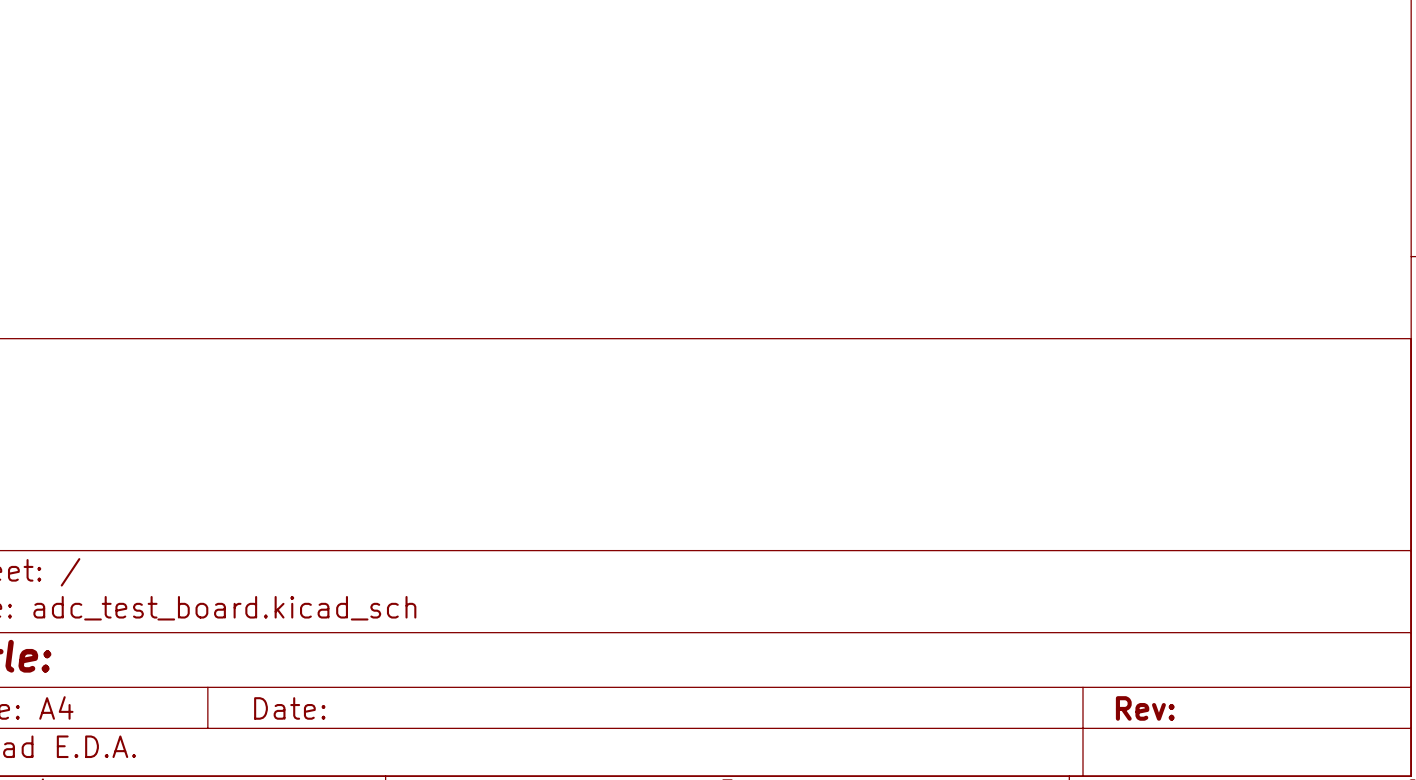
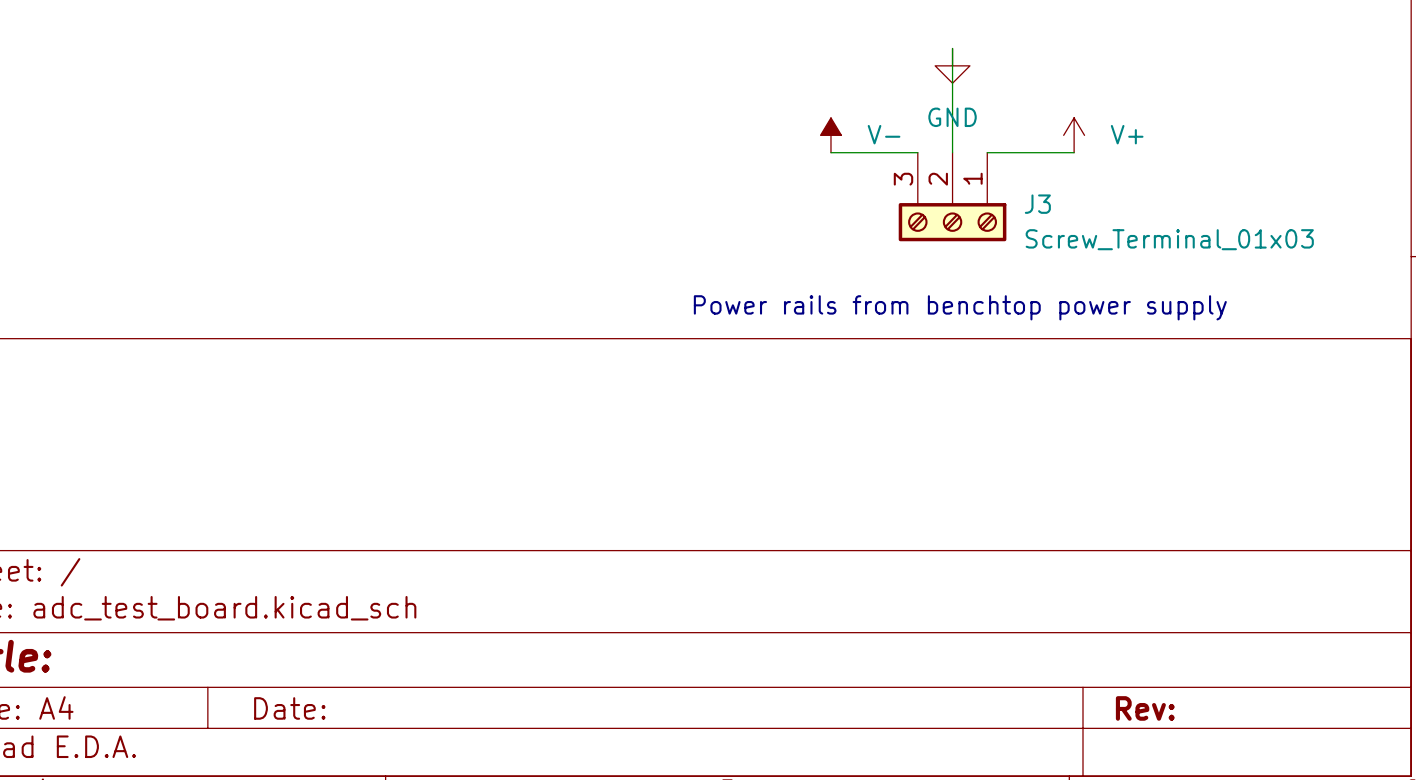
wire: none -> (952, 48) (952, 152)
power symbol: none -> GND (952, 65)
power symbol: none -> V- (830, 135)
power symbol: none -> V+ (1074, 135)
wire: none -> (830, 152) (917, 152)
wire: none -> (987, 152) (1074, 152)
J3: none -> Screw_Terminal_01x03 (952, 196)
text: none -> Power rails from benchtop power supply (960, 307)

